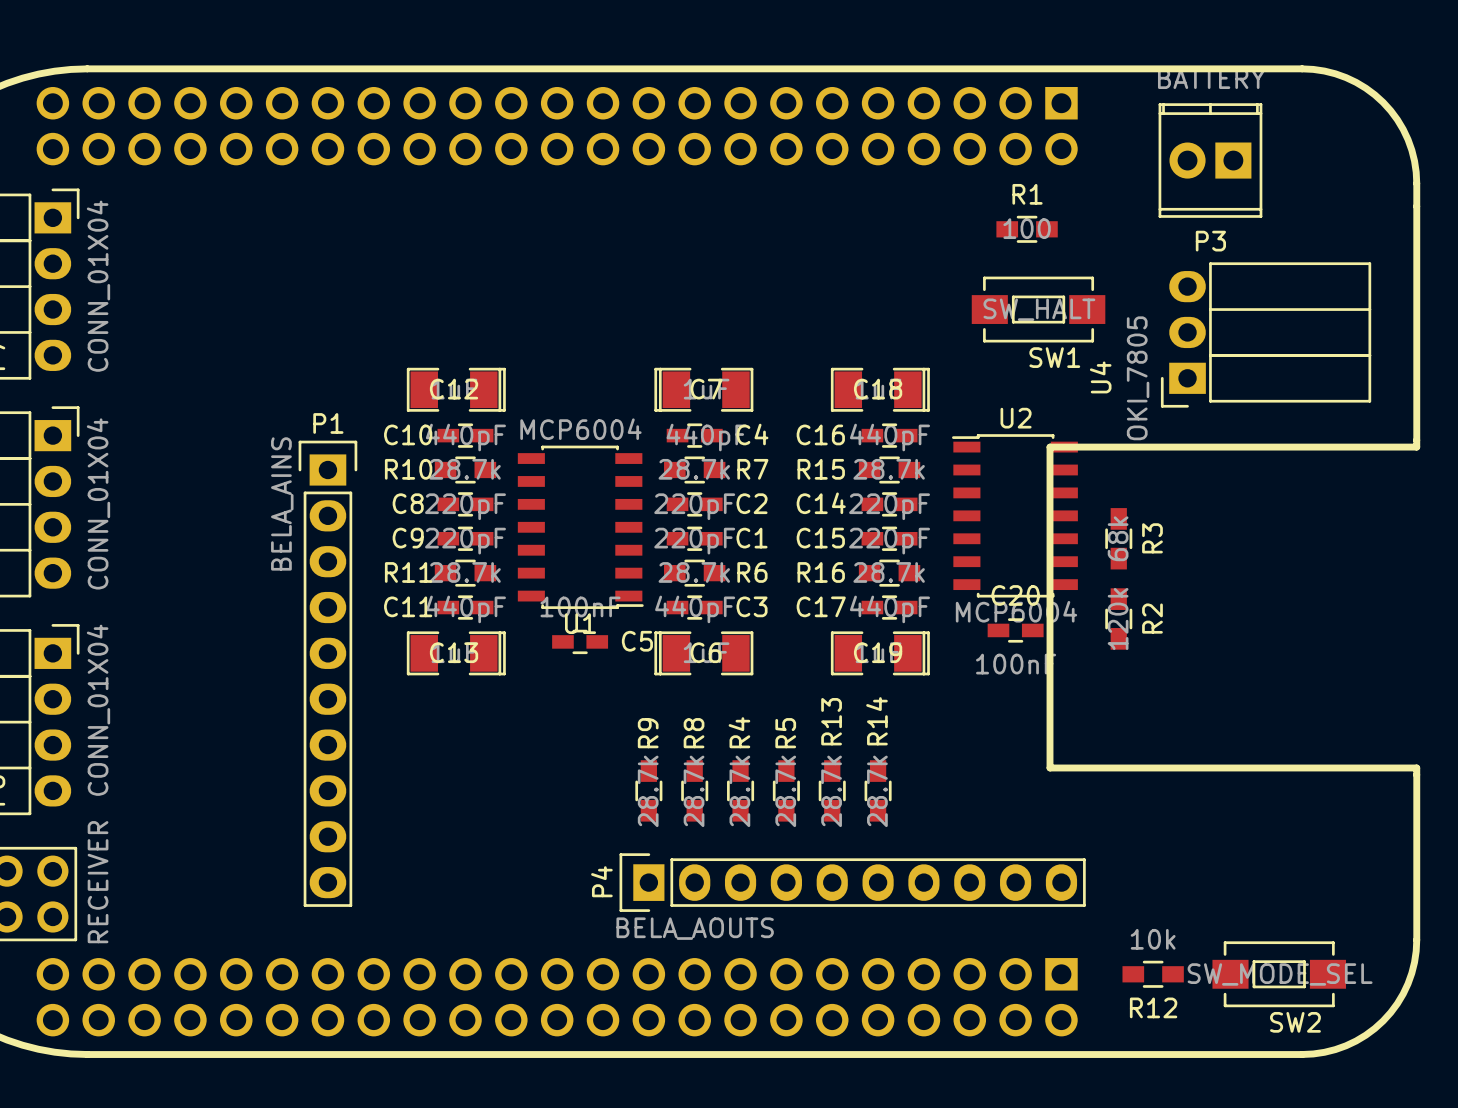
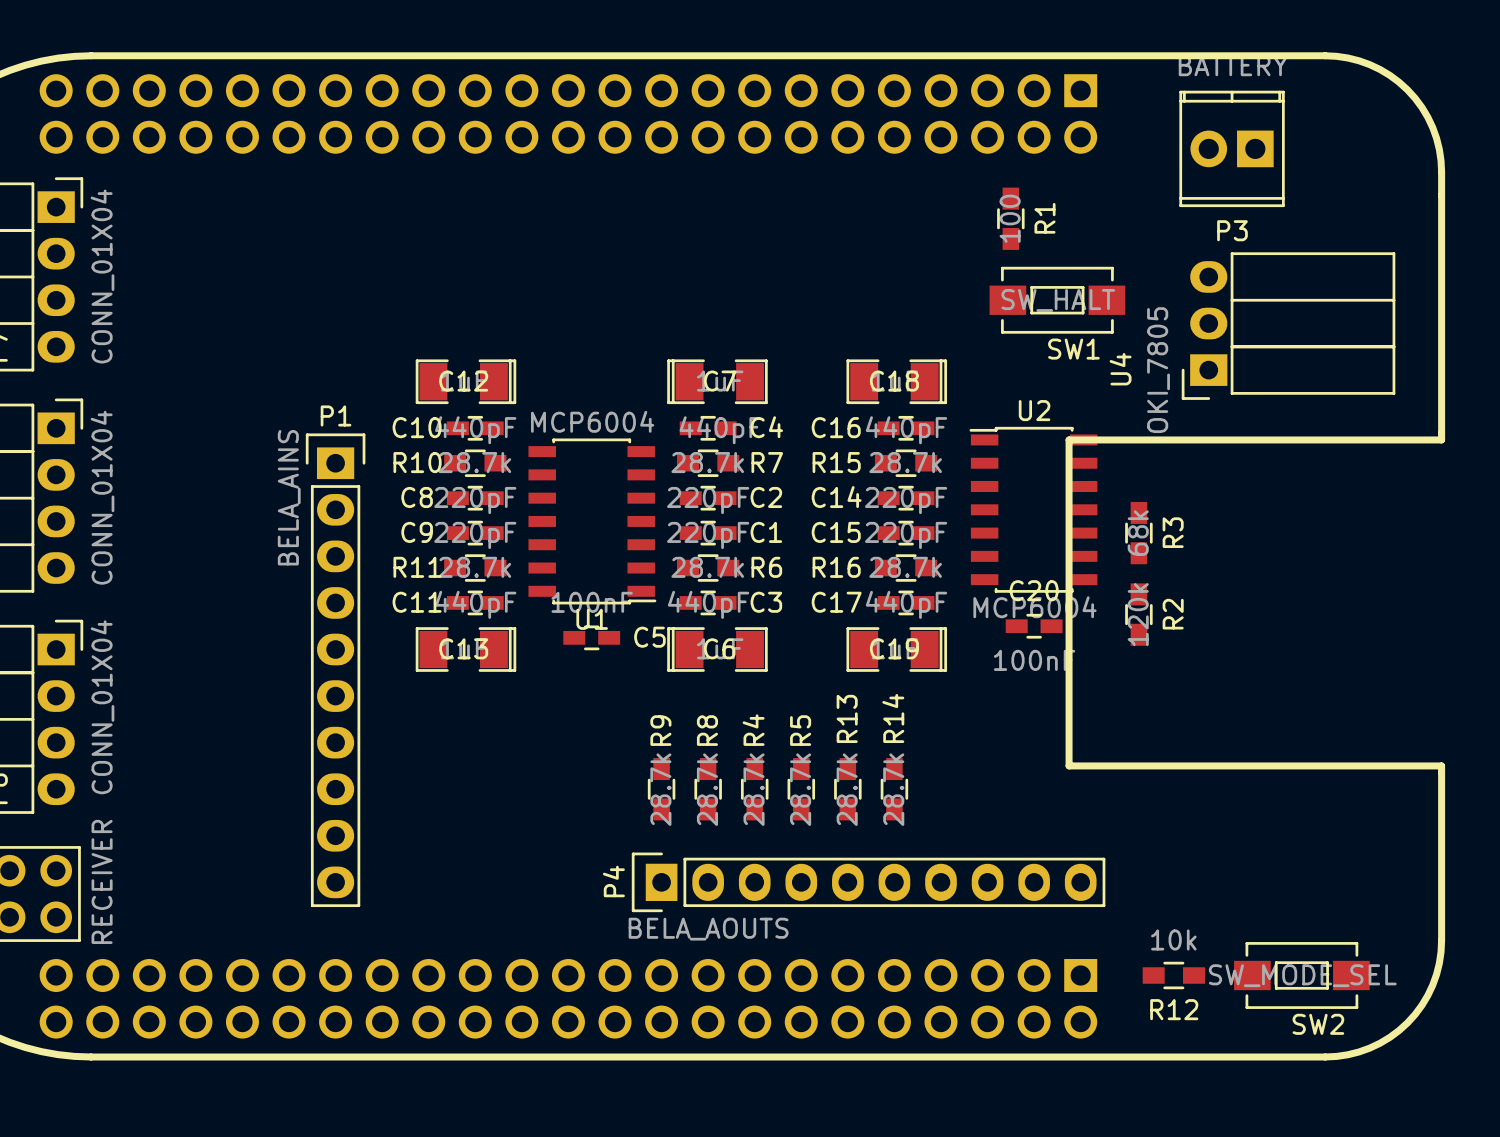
R1 rotation: 0° (1027, 229) -> 90° clockwise (1010, 218)

